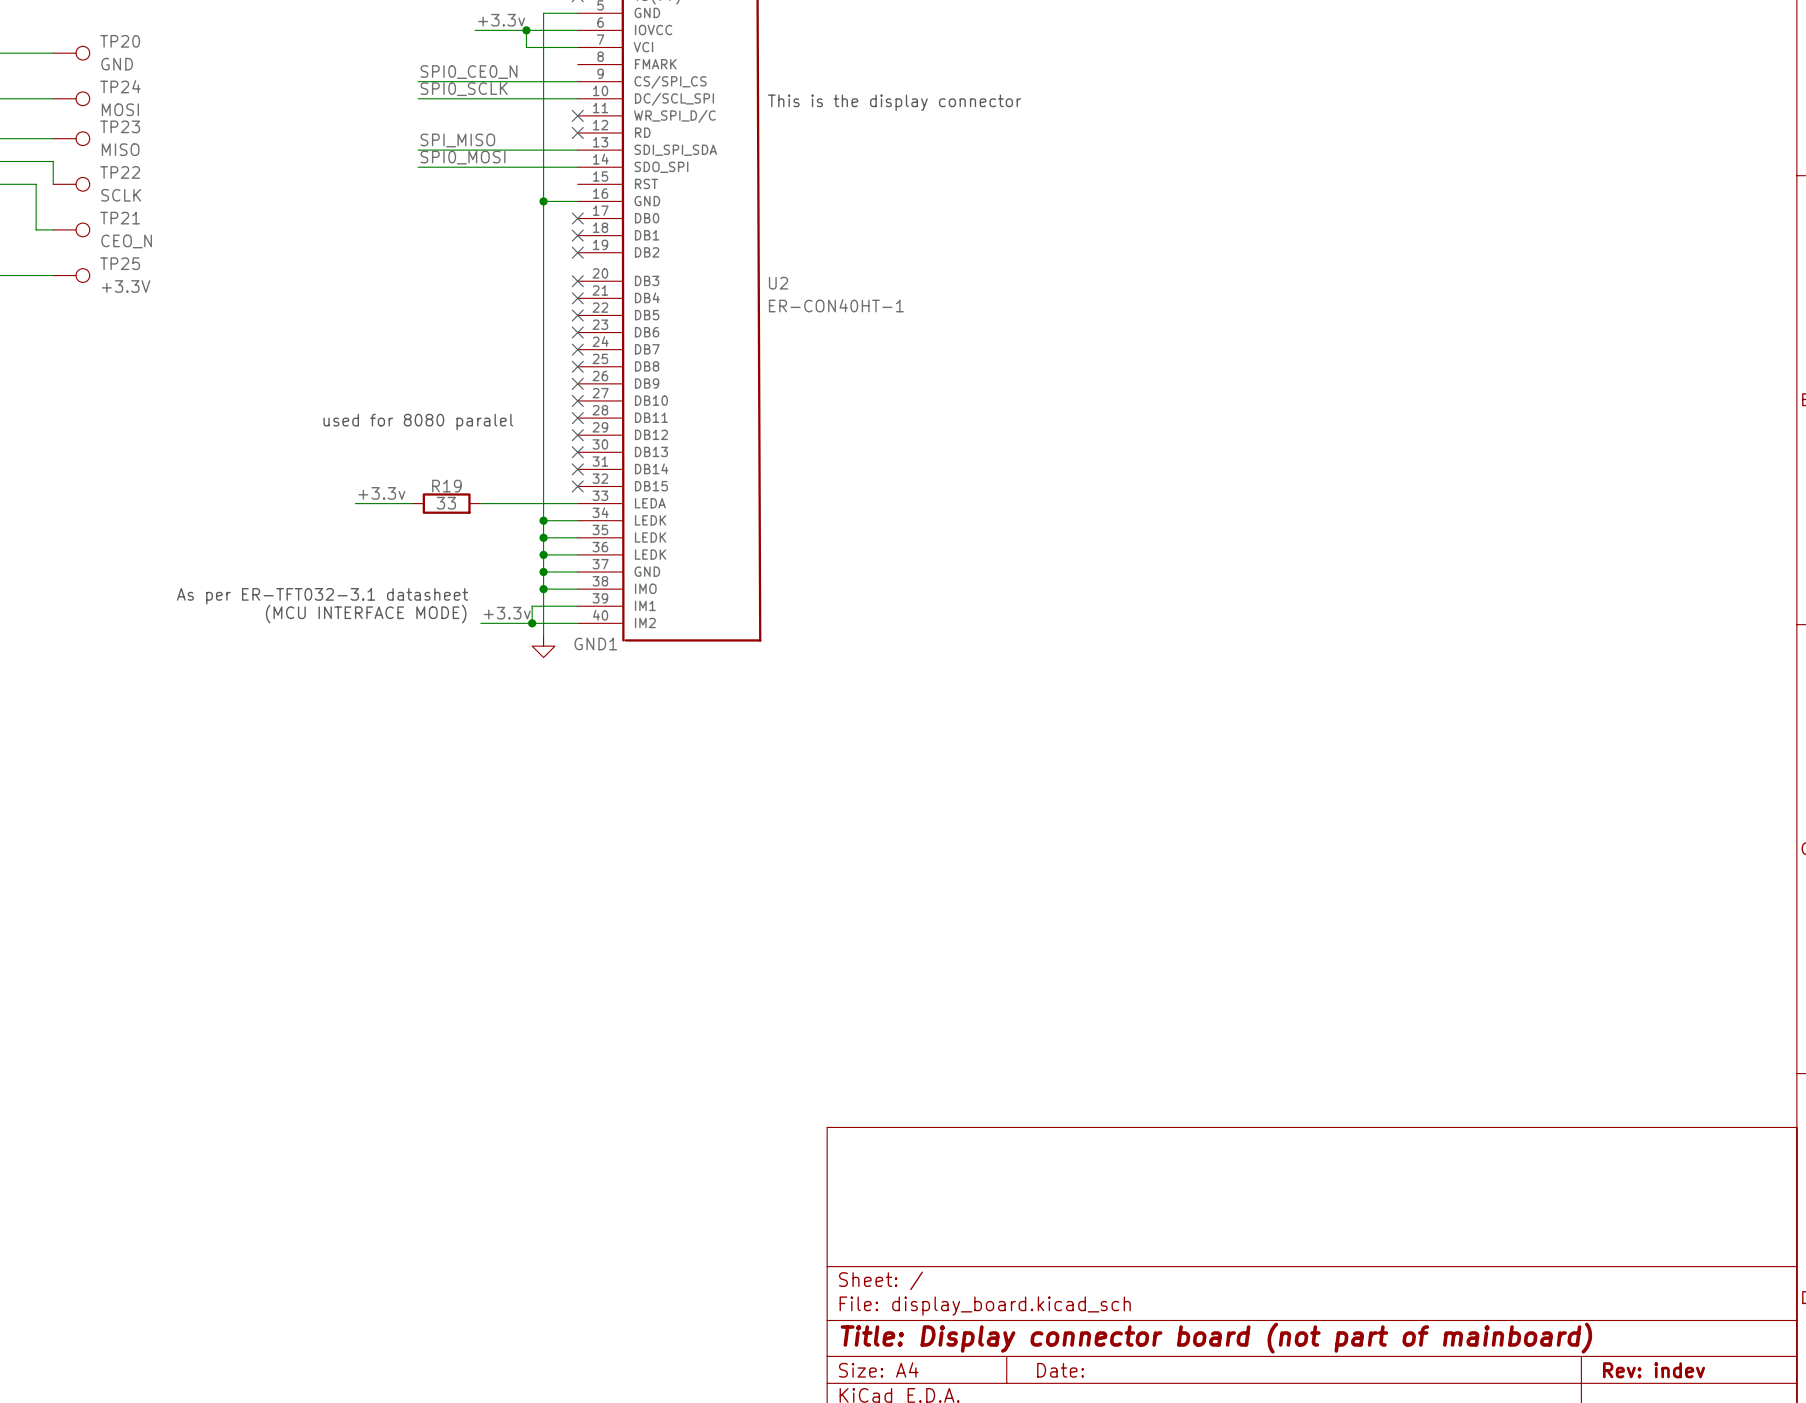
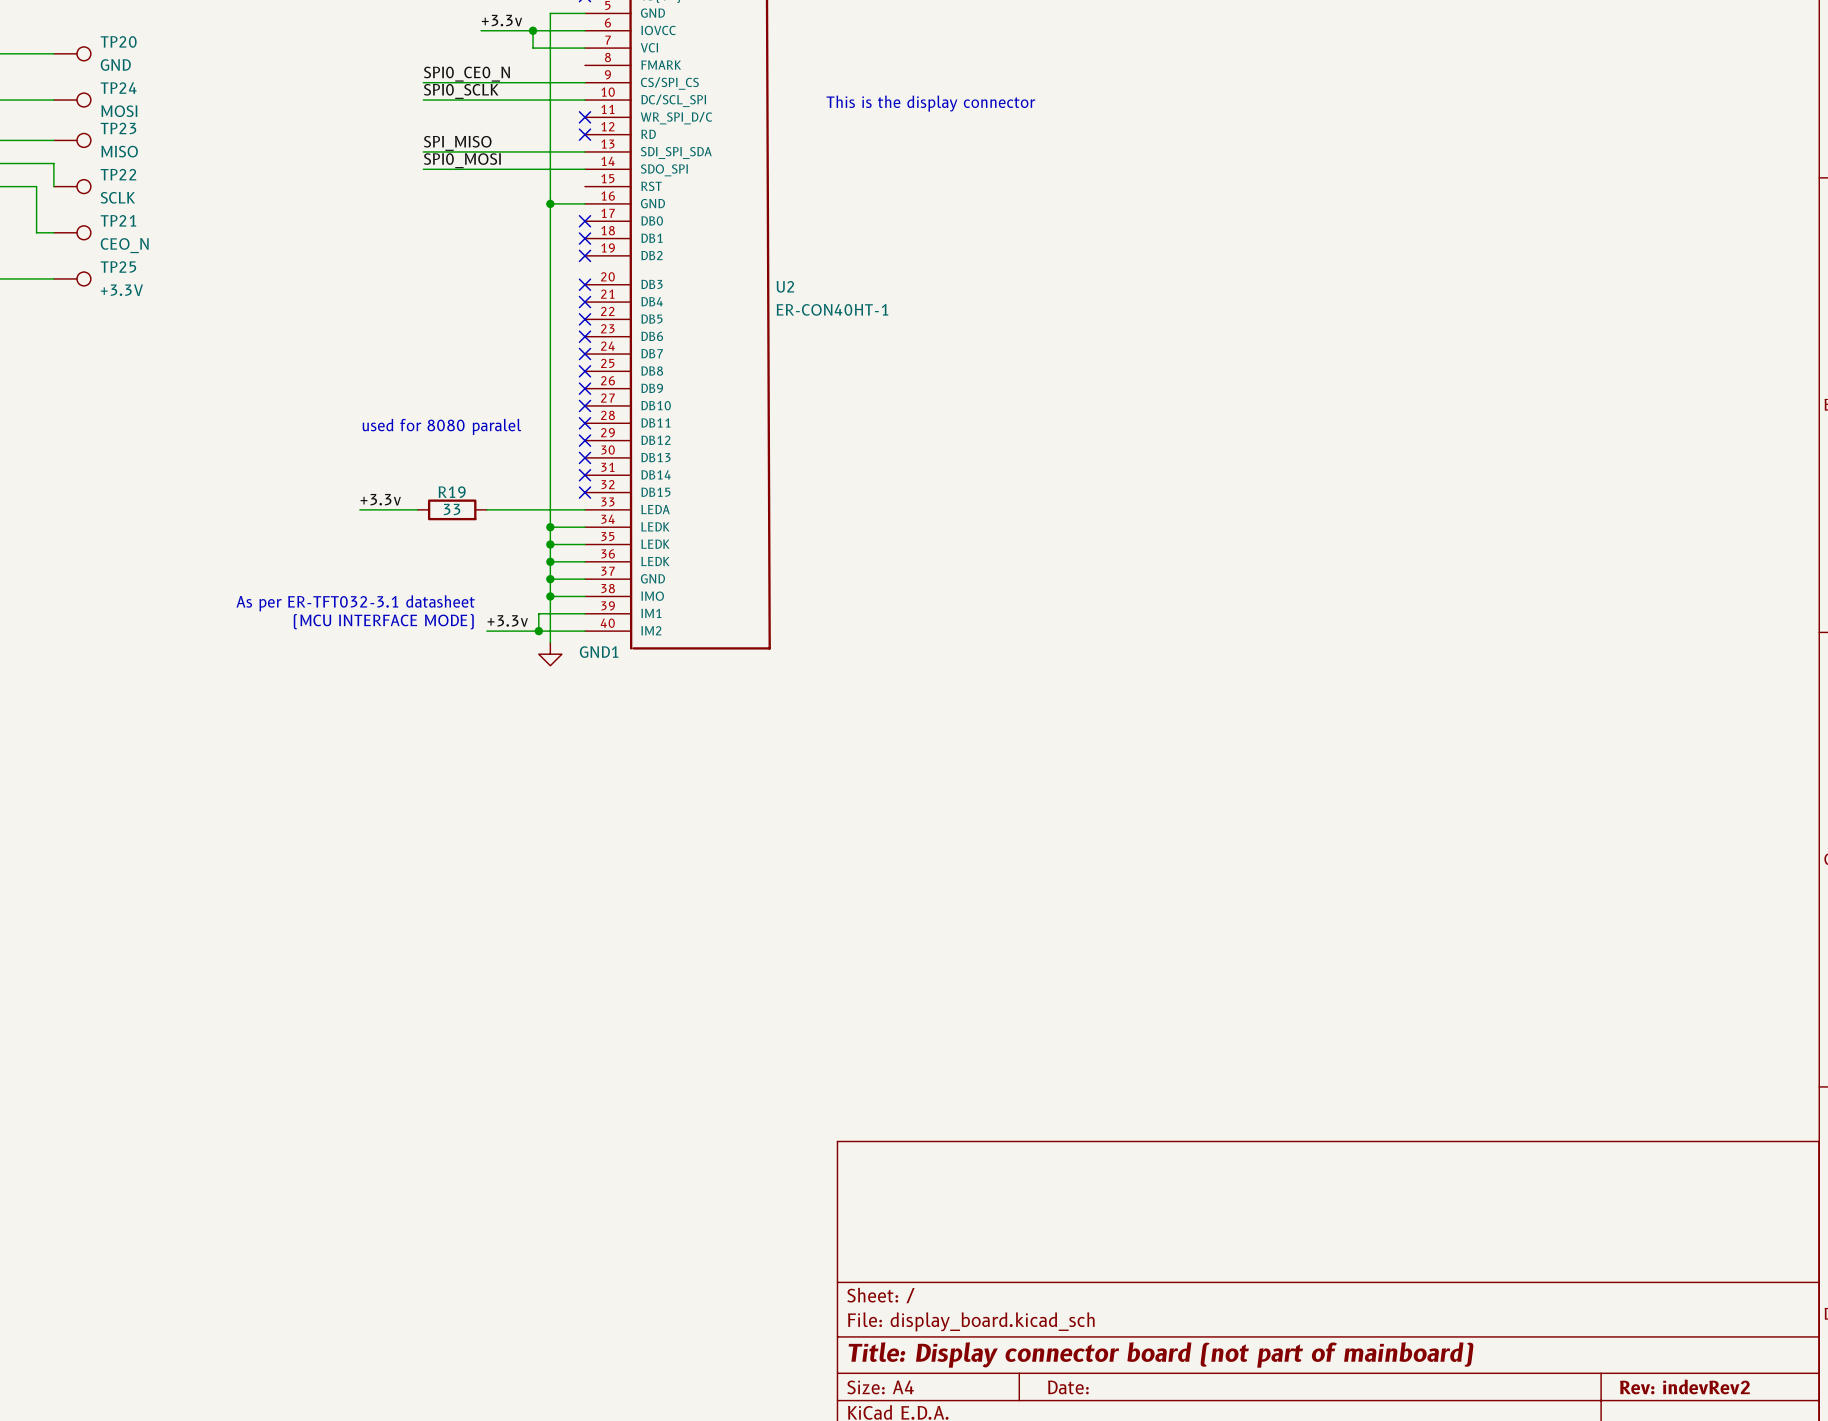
title block: Rev: indev (1654, 1370) -> Rev: indevRev2 (1684, 1386)

